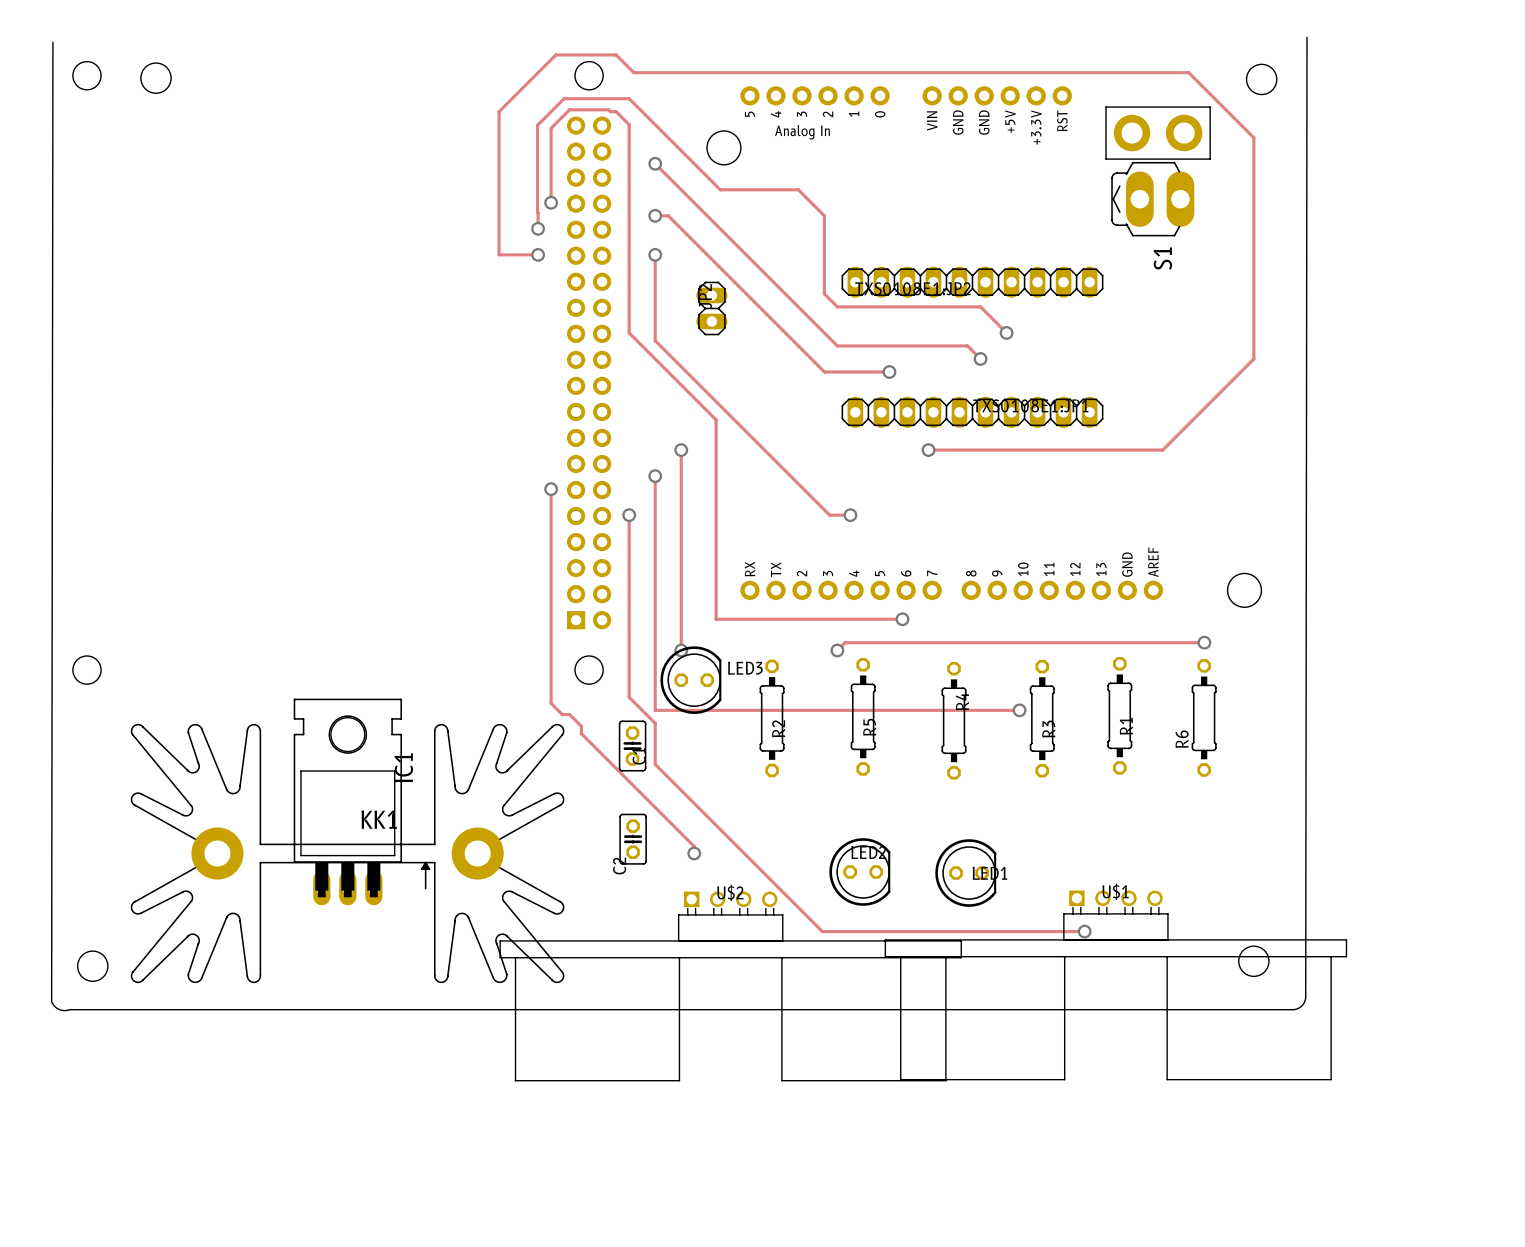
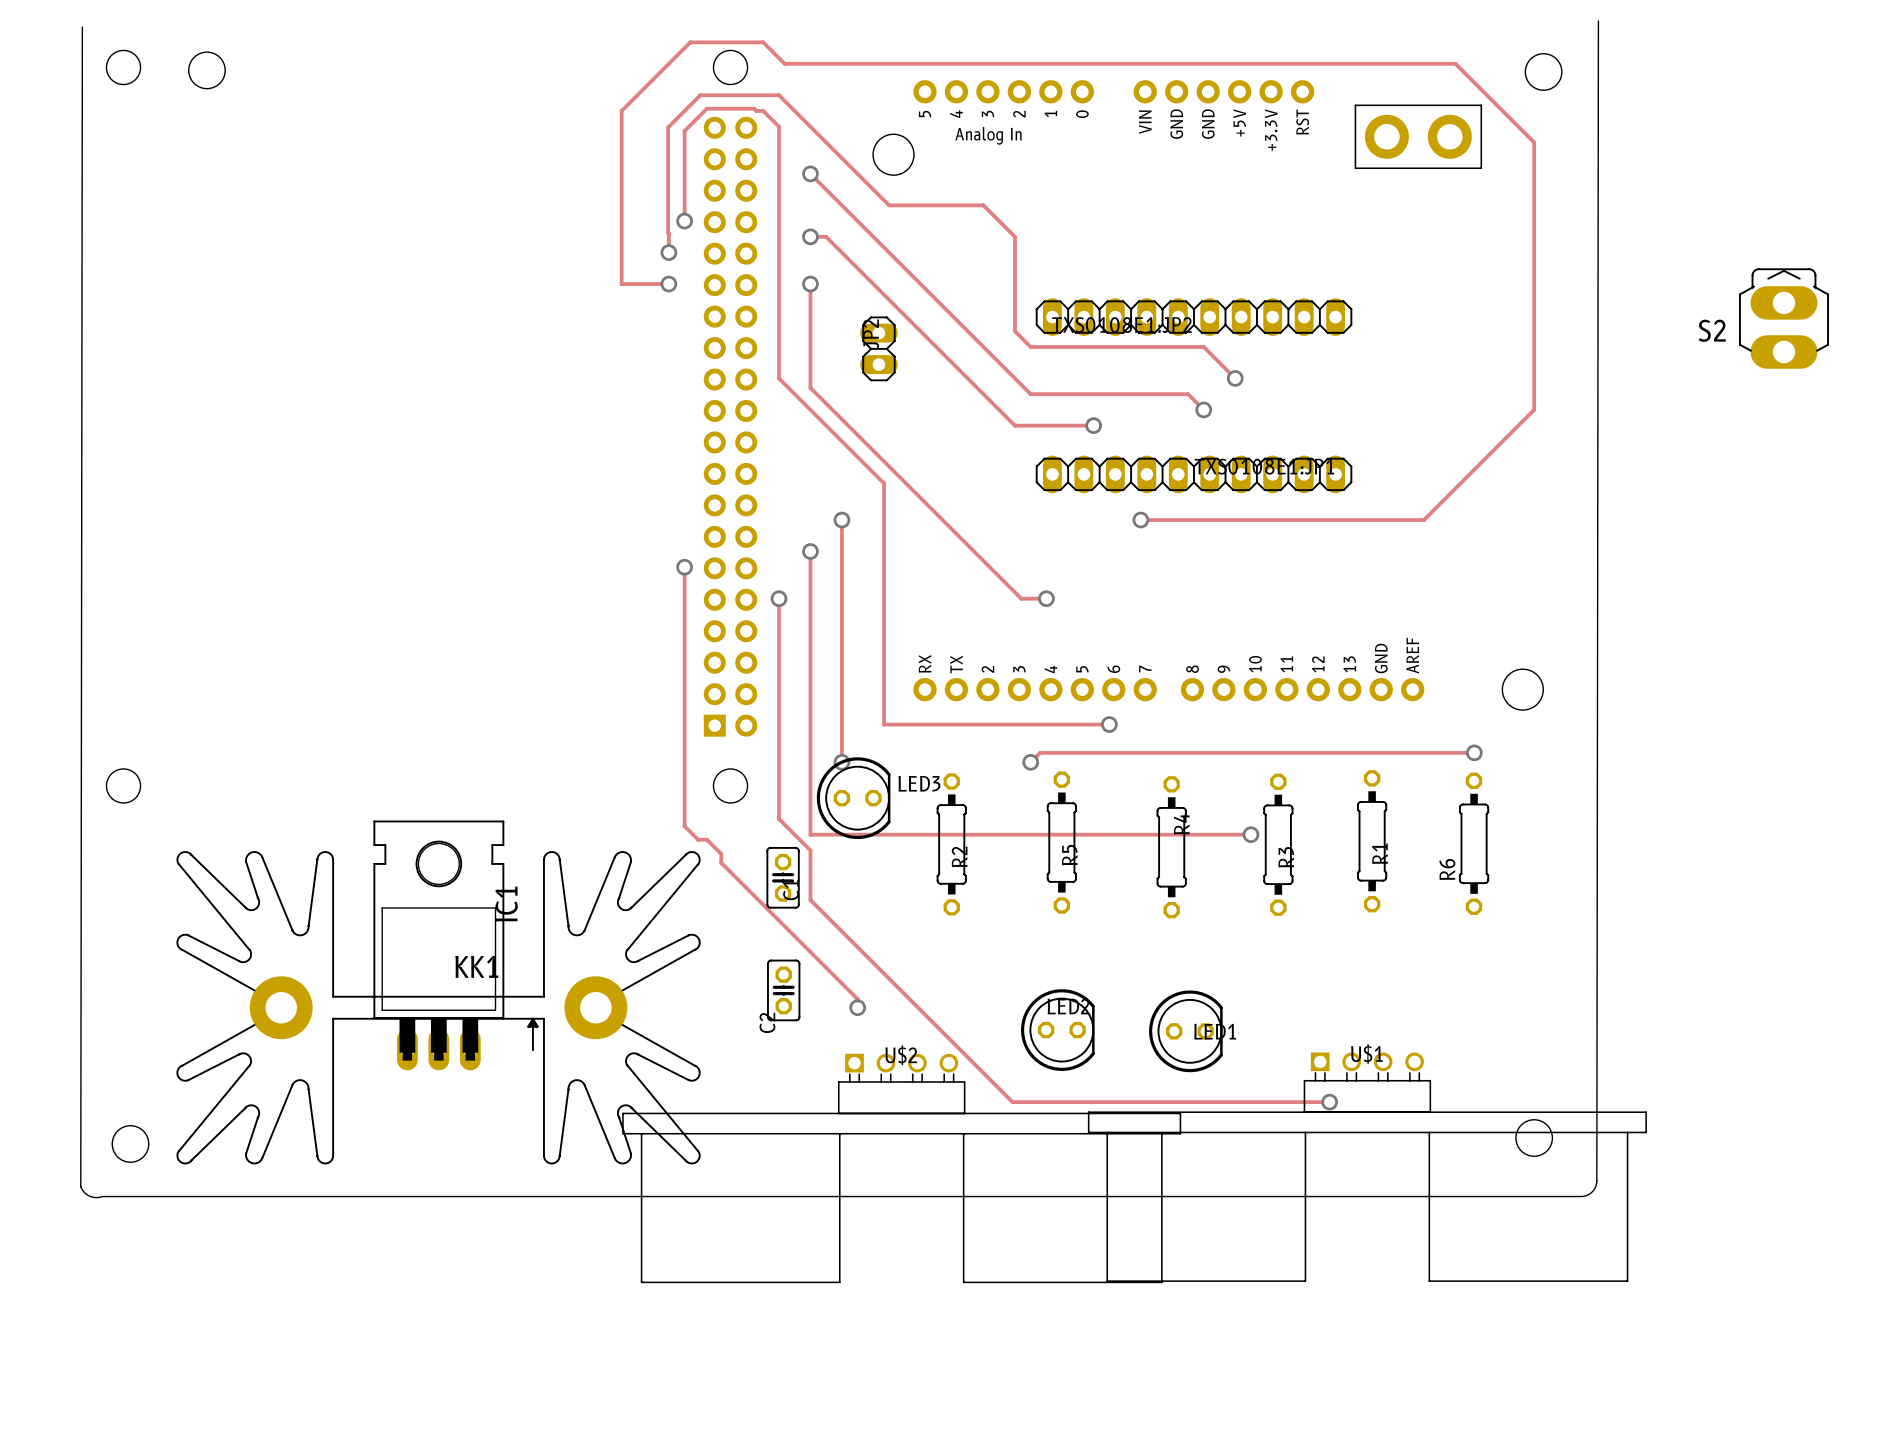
S1: (1152, 199) -> none
S2: none -> (1783, 318)

